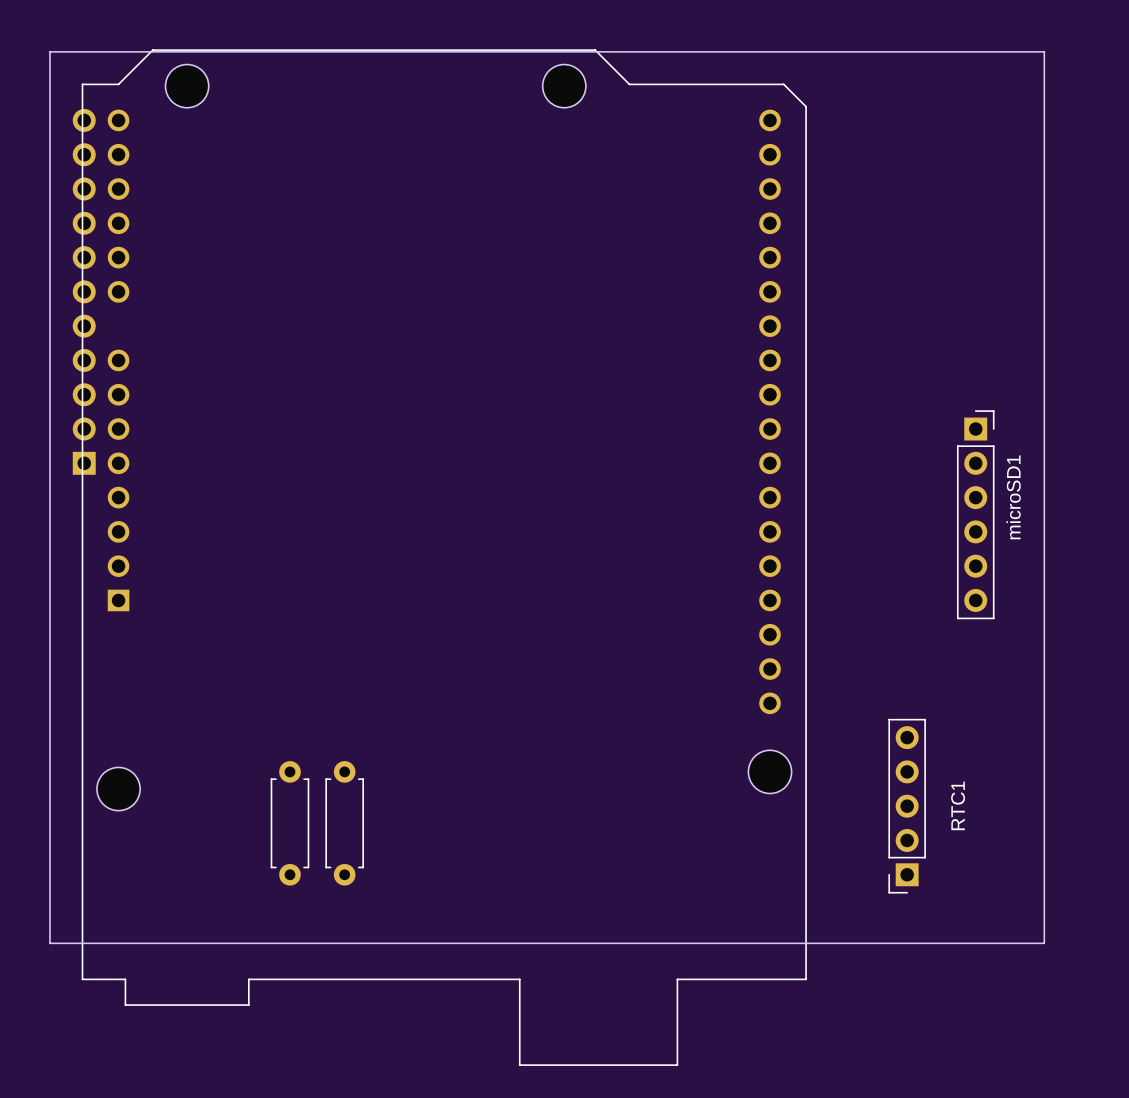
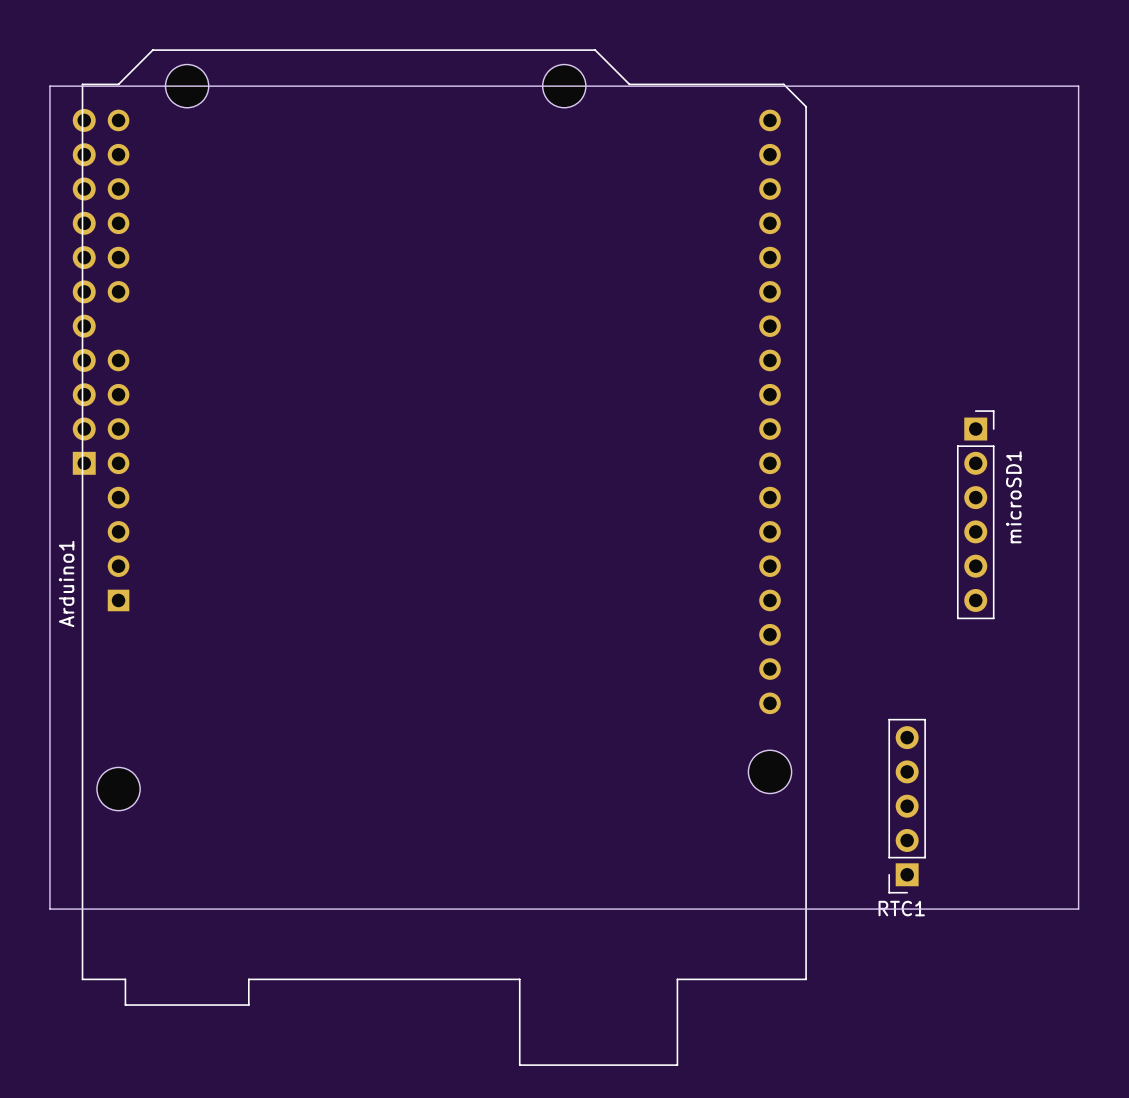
board edge: (49, 86) (49, 51) (1044, 51) (1044, 943) (49, 943) (49, 909) -> (49, 86) (1078, 86) (1078, 909) (49, 909)
Arduino1 name: none -> Arduino1 (66, 583)
RTC1 name rotation: 0° (958, 805) -> 90° clockwise (901, 908)
RTC1 name position: RTC1 (958, 805) -> RTC1 (901, 908)
part: (289, 823) -> none
part: (344, 823) -> none

